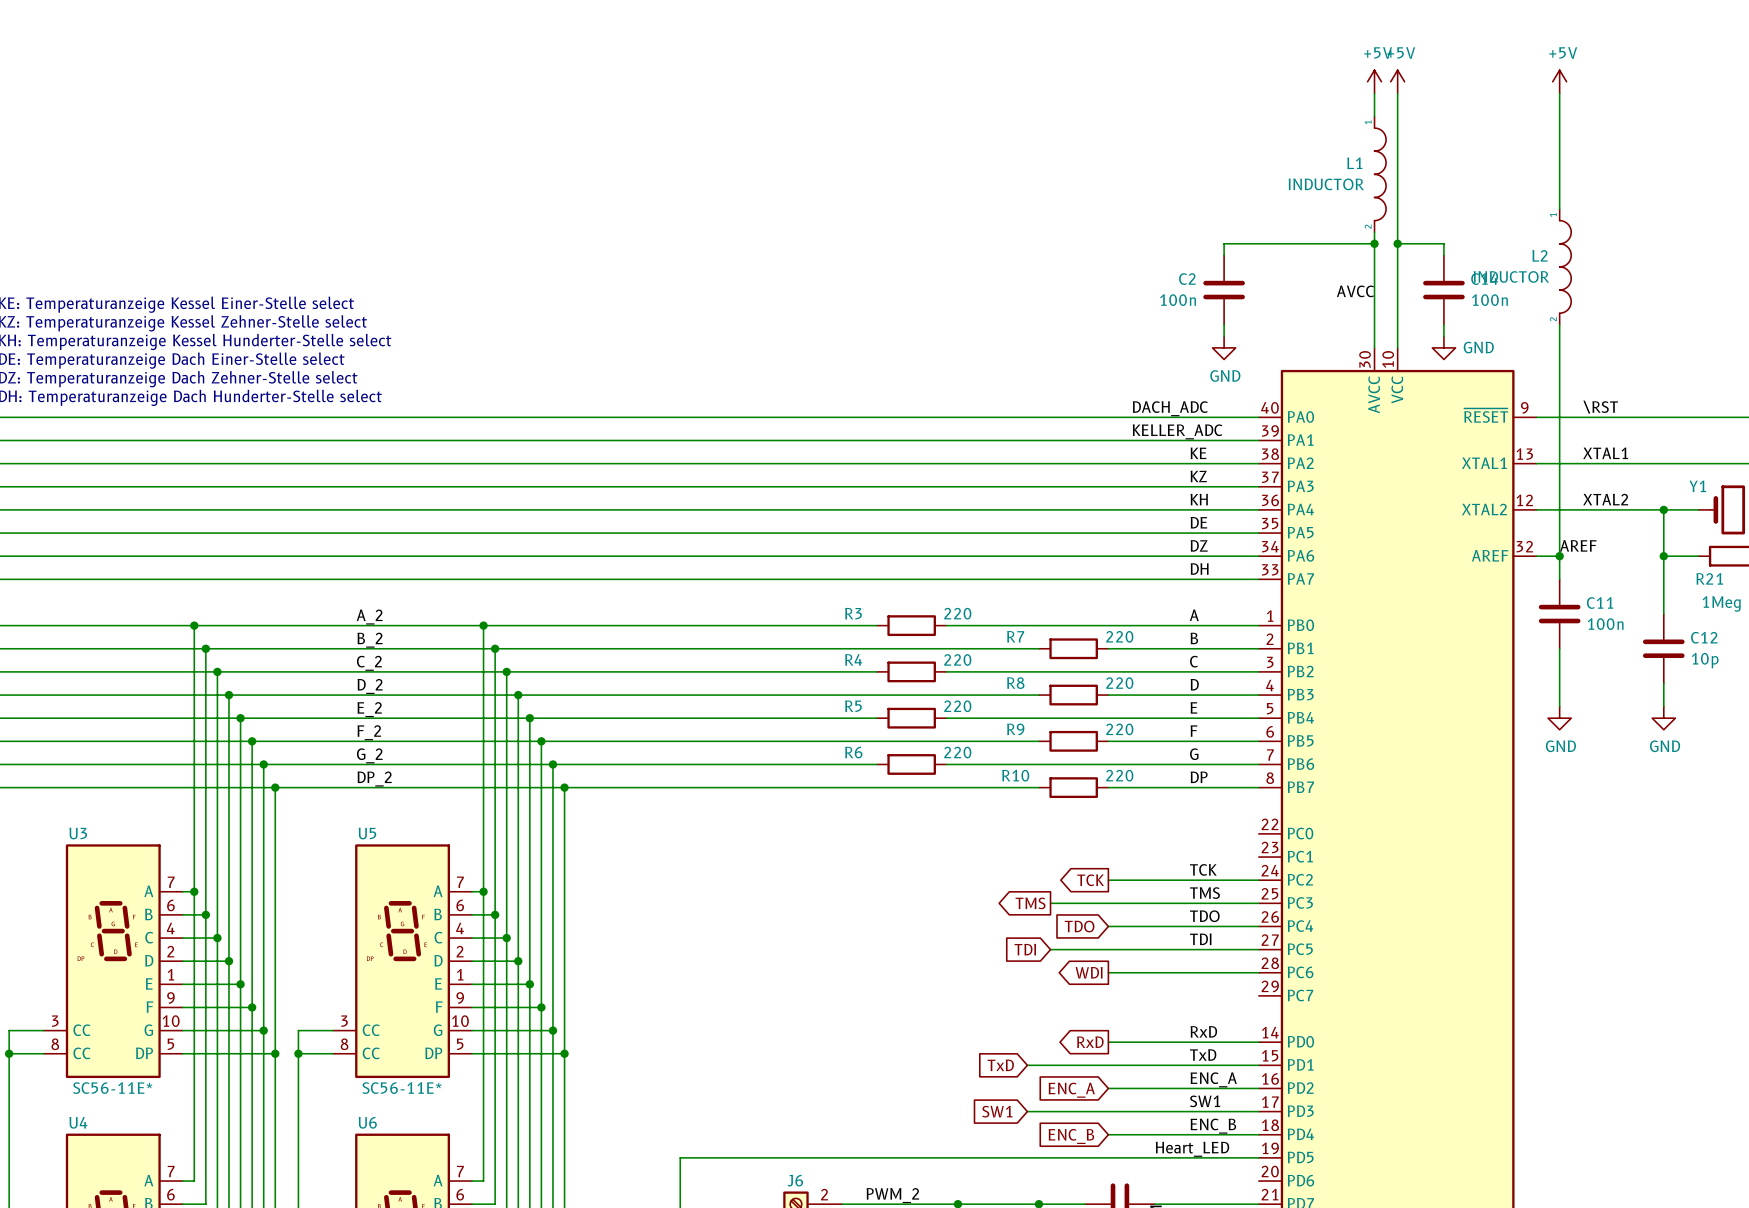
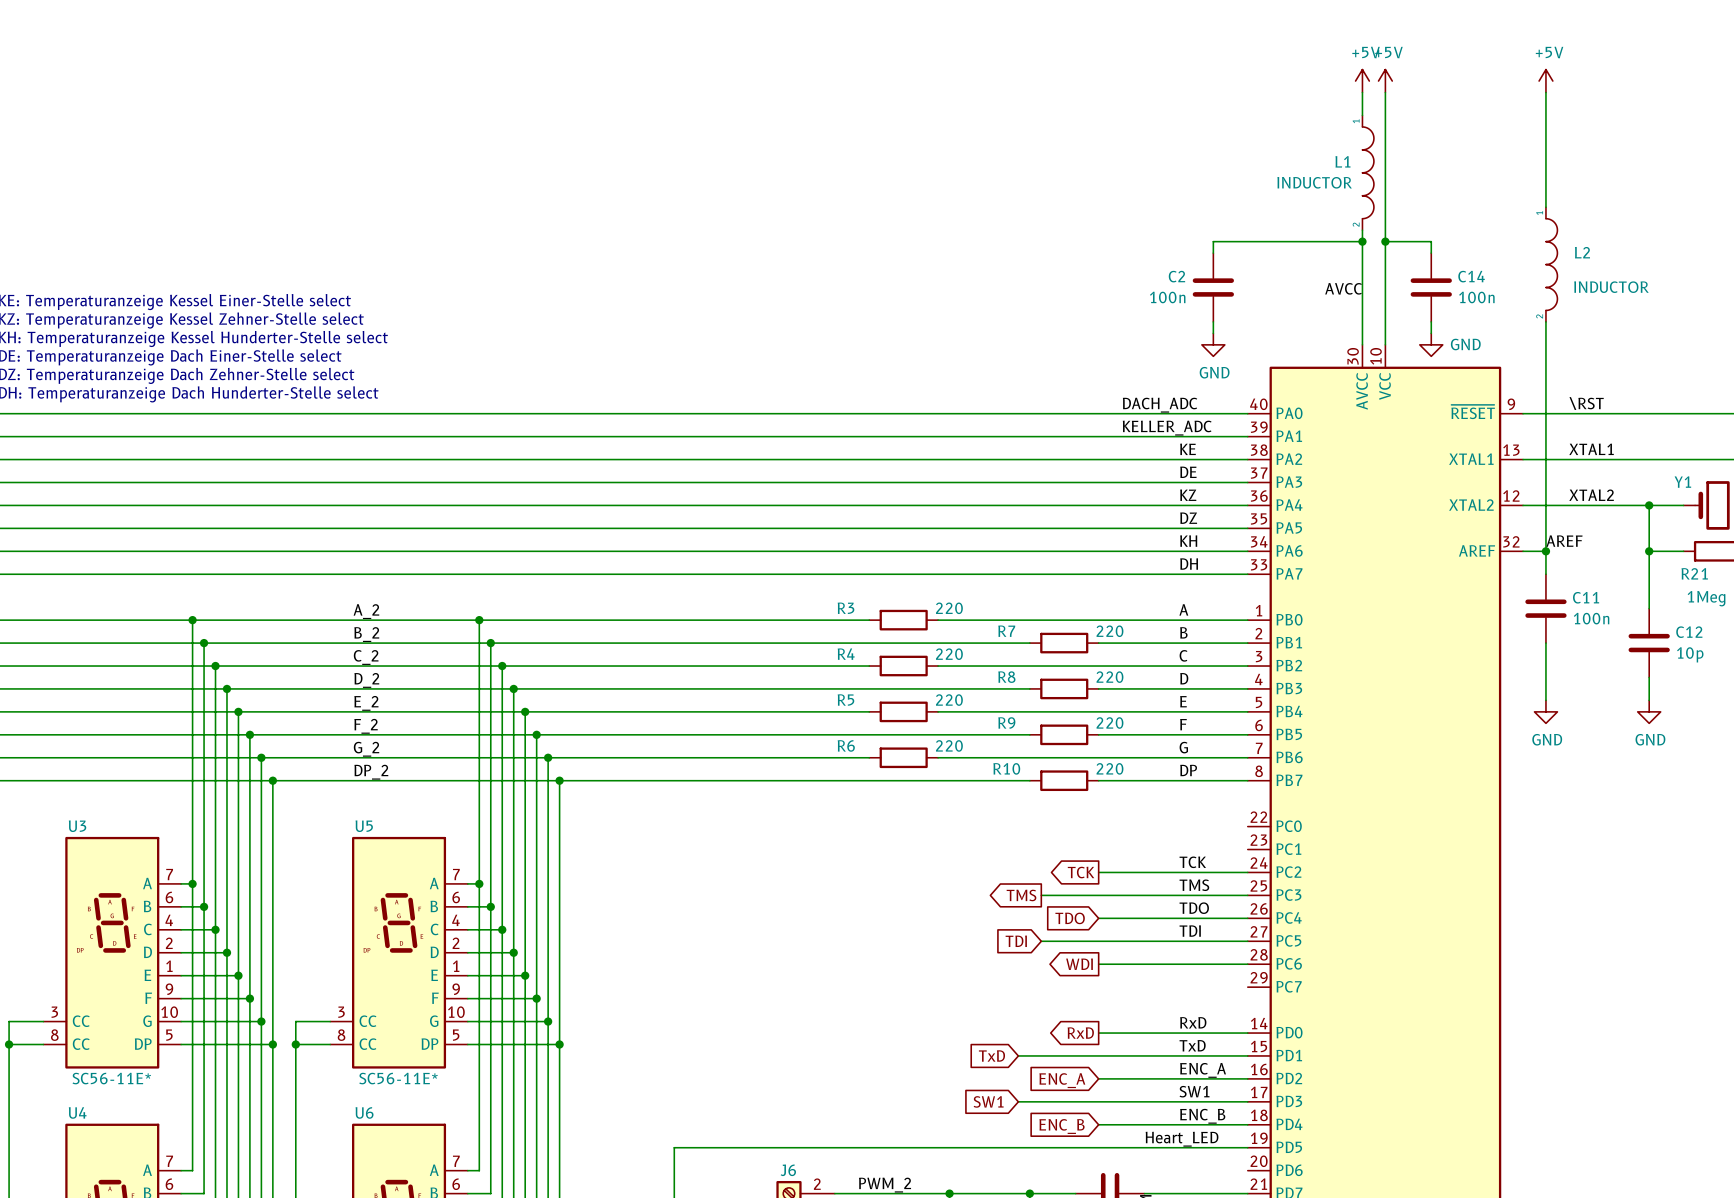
L2 name position: L2 (1540, 255) -> L2 (1582, 252)
L2 value position: INDUCTOR (1511, 276) -> INDUCTOR (1611, 287)
label: KZ (1198, 476) -> DE (1188, 472)
label: KH (1199, 499) -> KZ (1188, 495)
label: DE (1198, 522) -> DZ (1188, 518)
label: DZ (1199, 545) -> KH (1188, 541)

